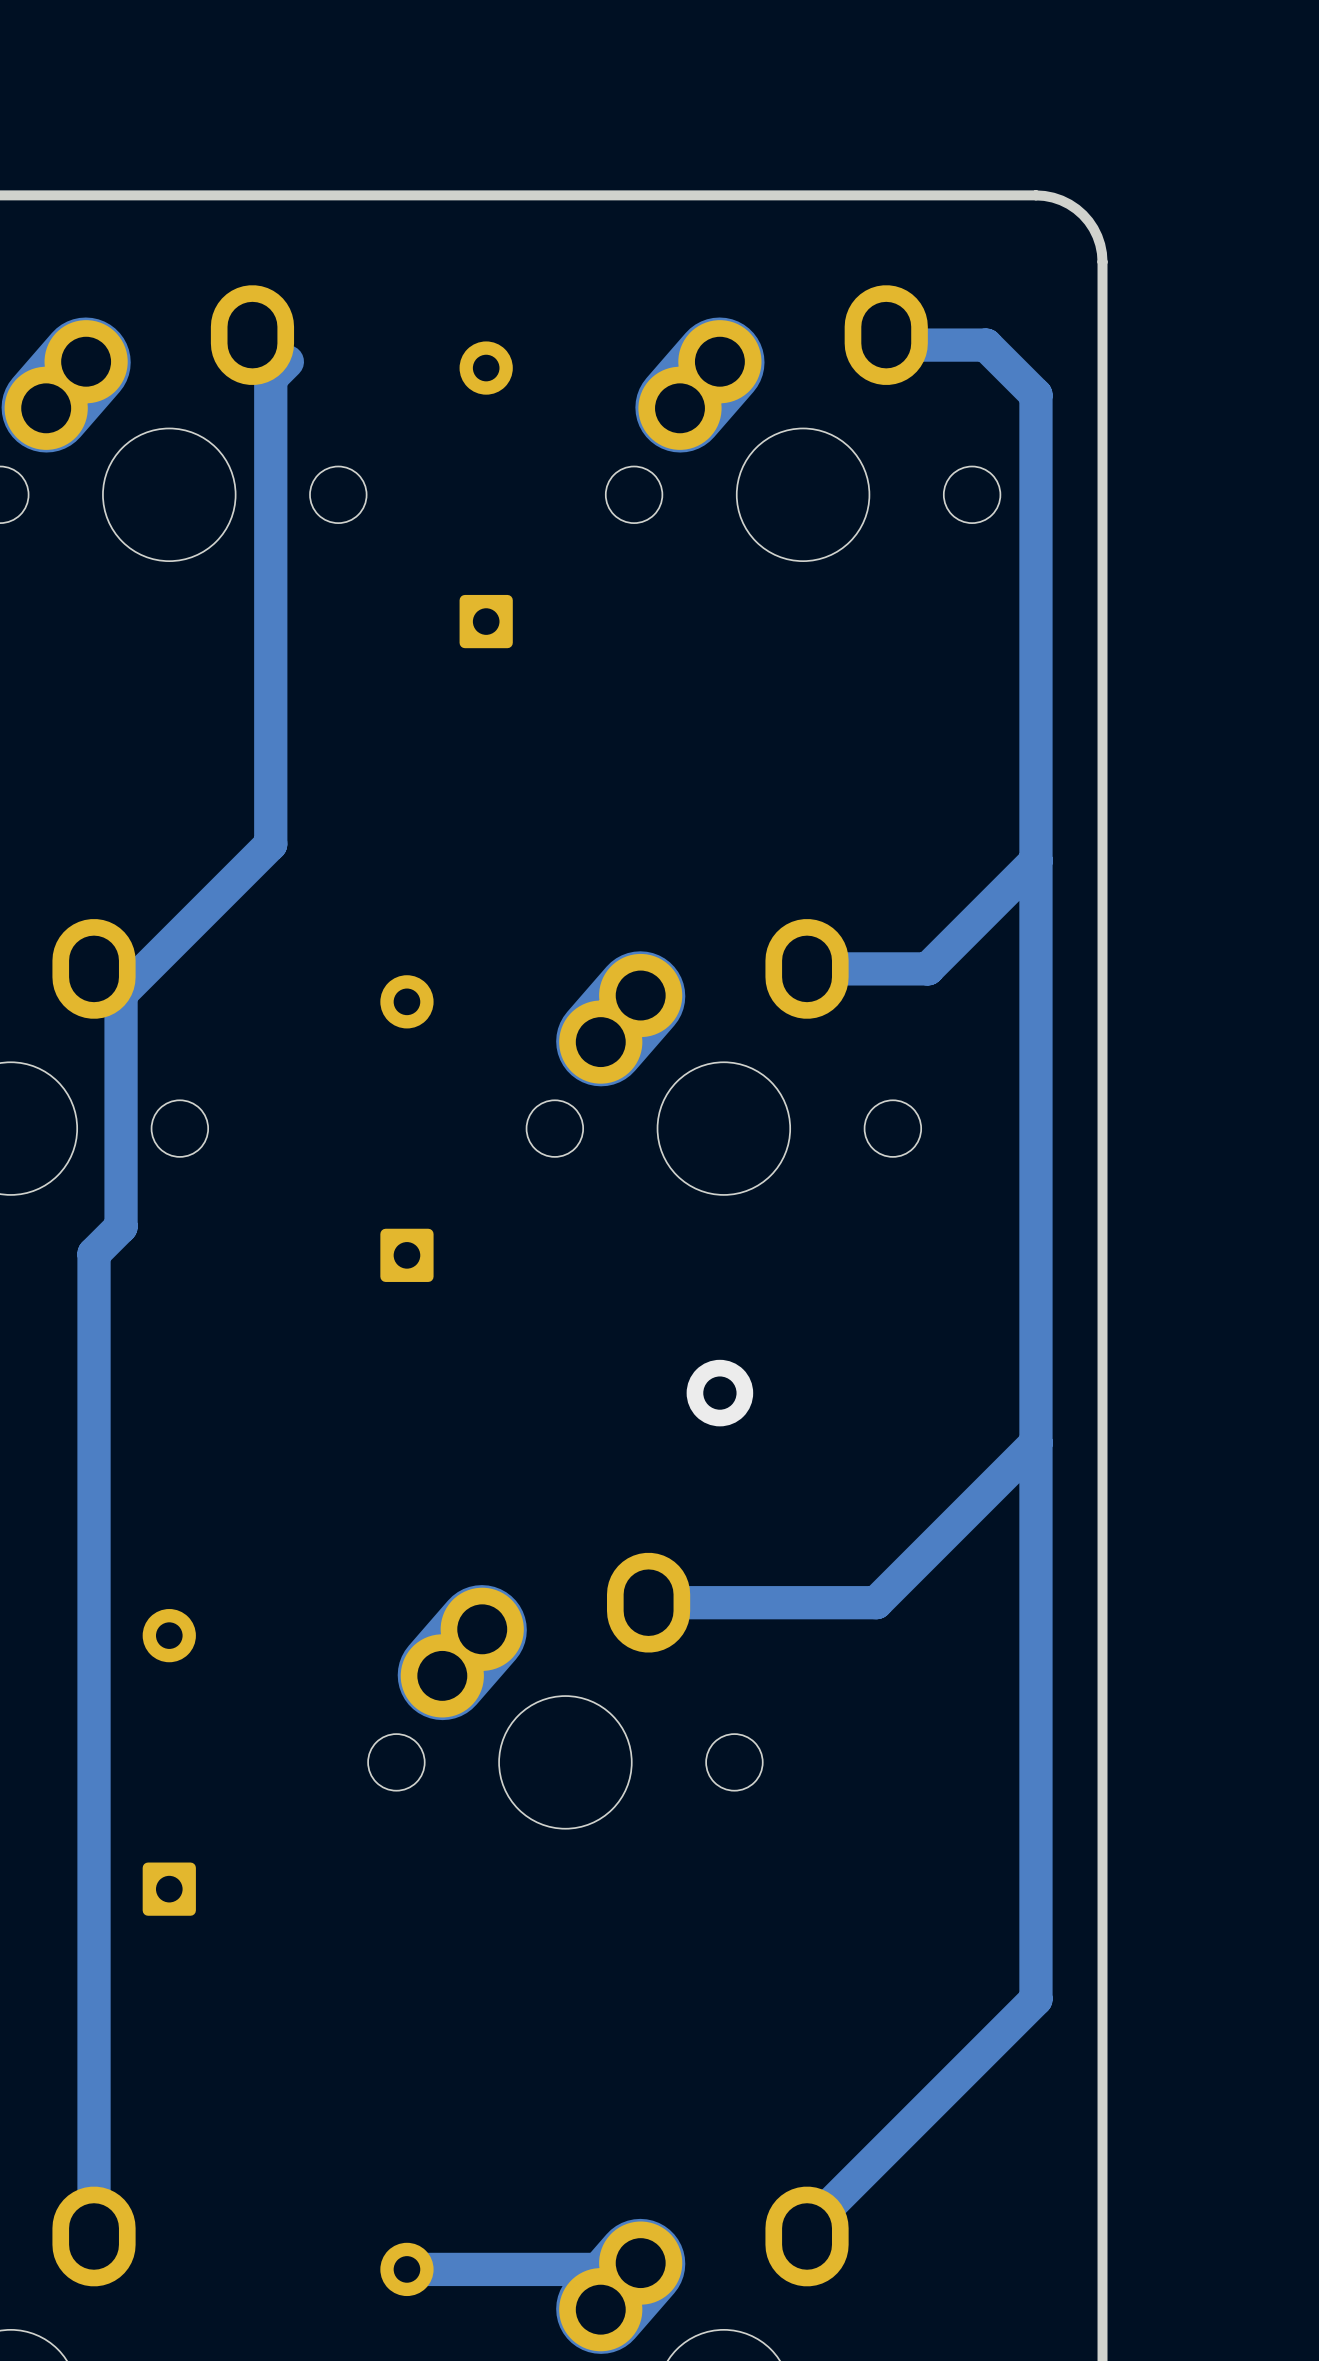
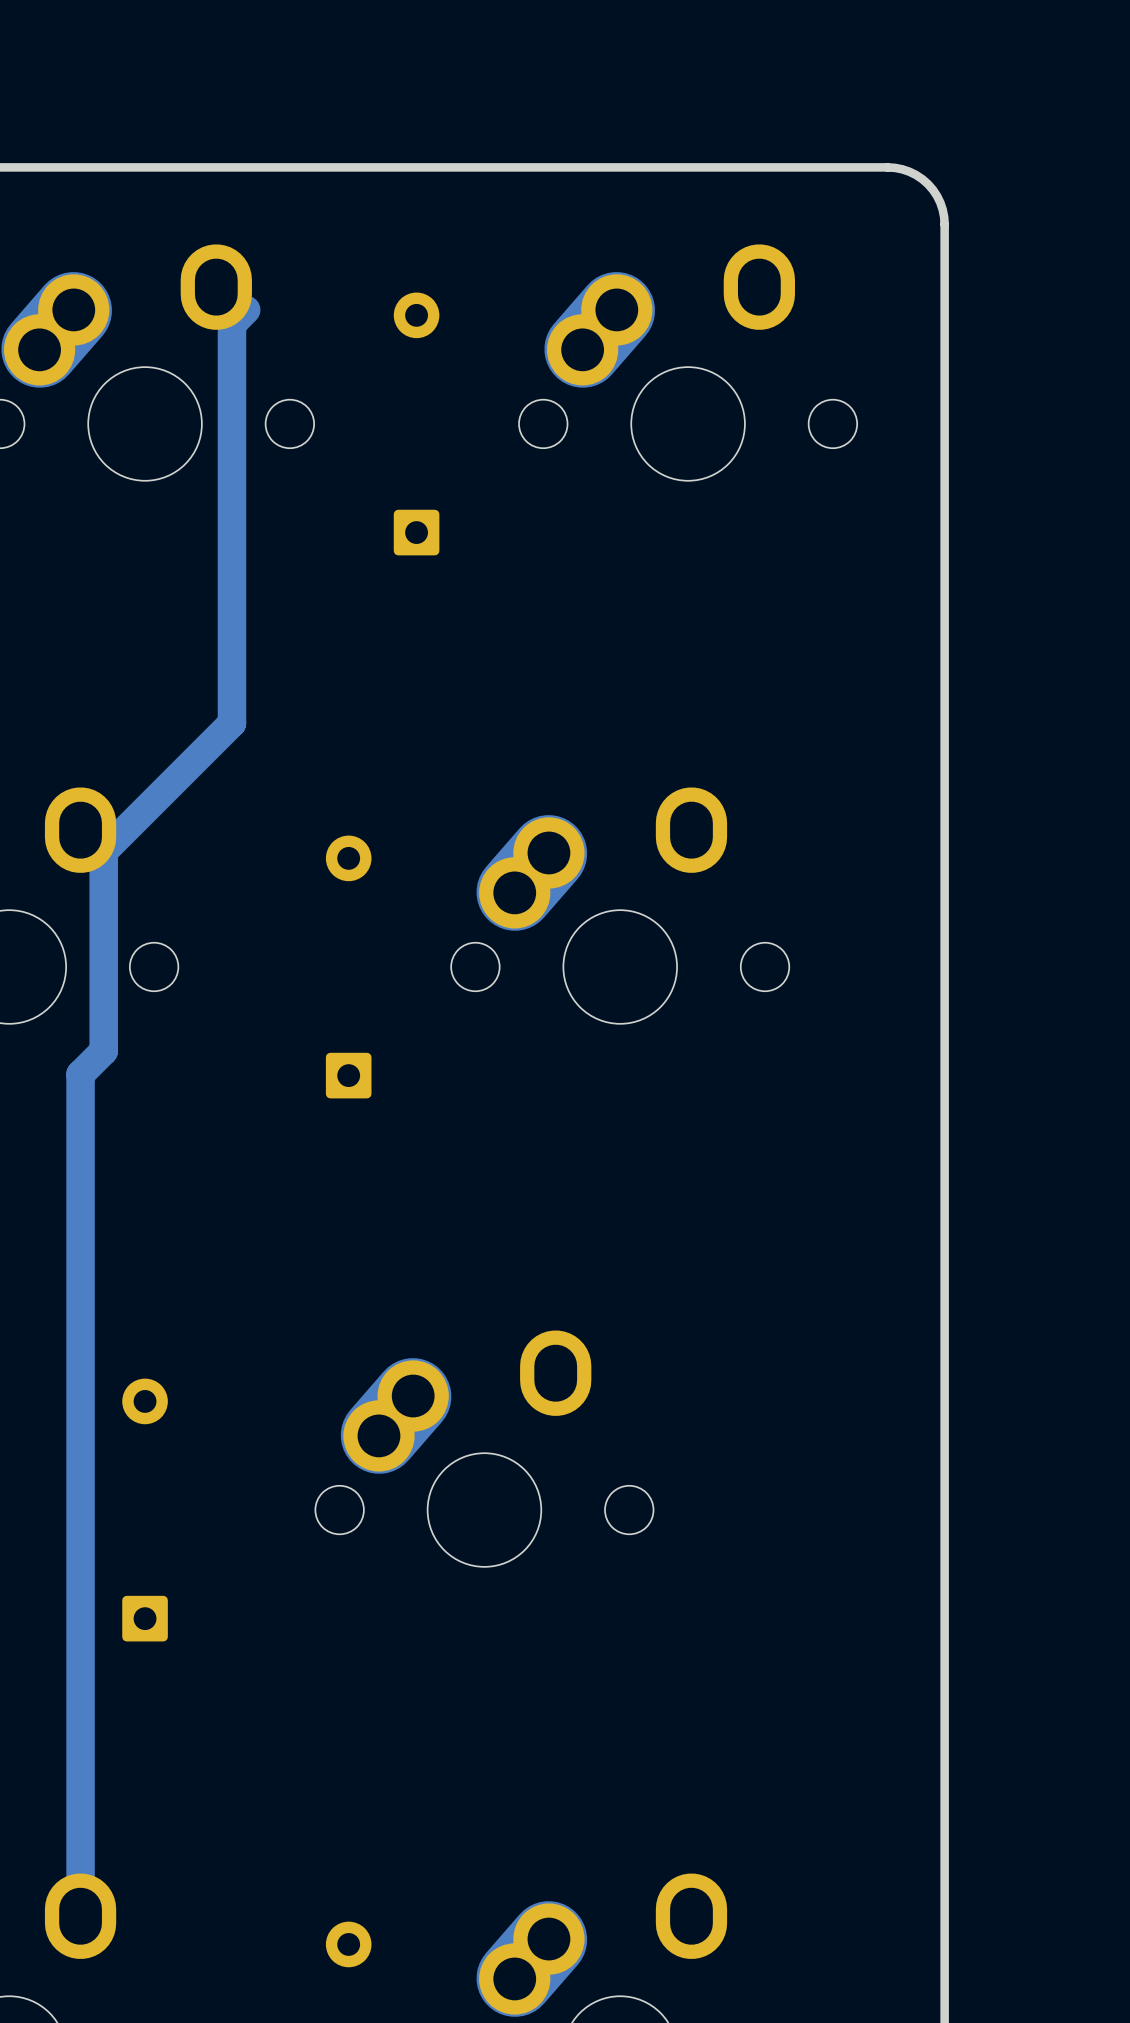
track: (902, 345) (986, 345) (1035, 394) (1035, 1999) (807, 2228) -> none
track: (1035, 860) (927, 968) (807, 968) -> none
via: (719, 1393) -> none
track: (1035, 1443) (876, 1602) (648, 1602) -> none
track: (636, 2269) (406, 2269) -> none

